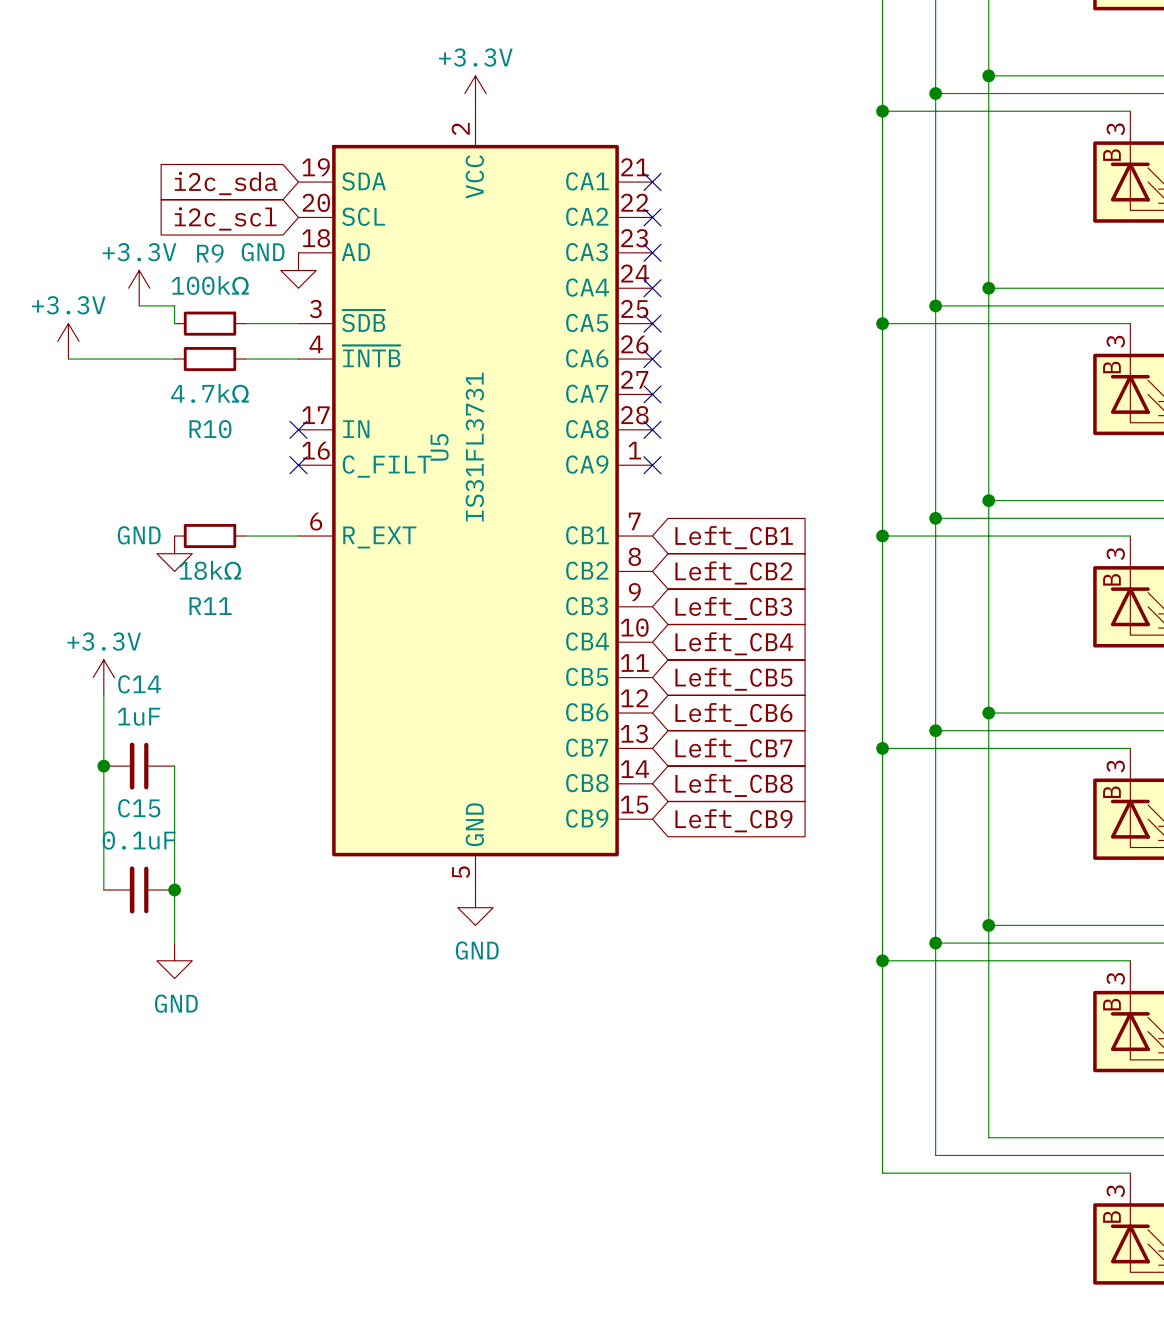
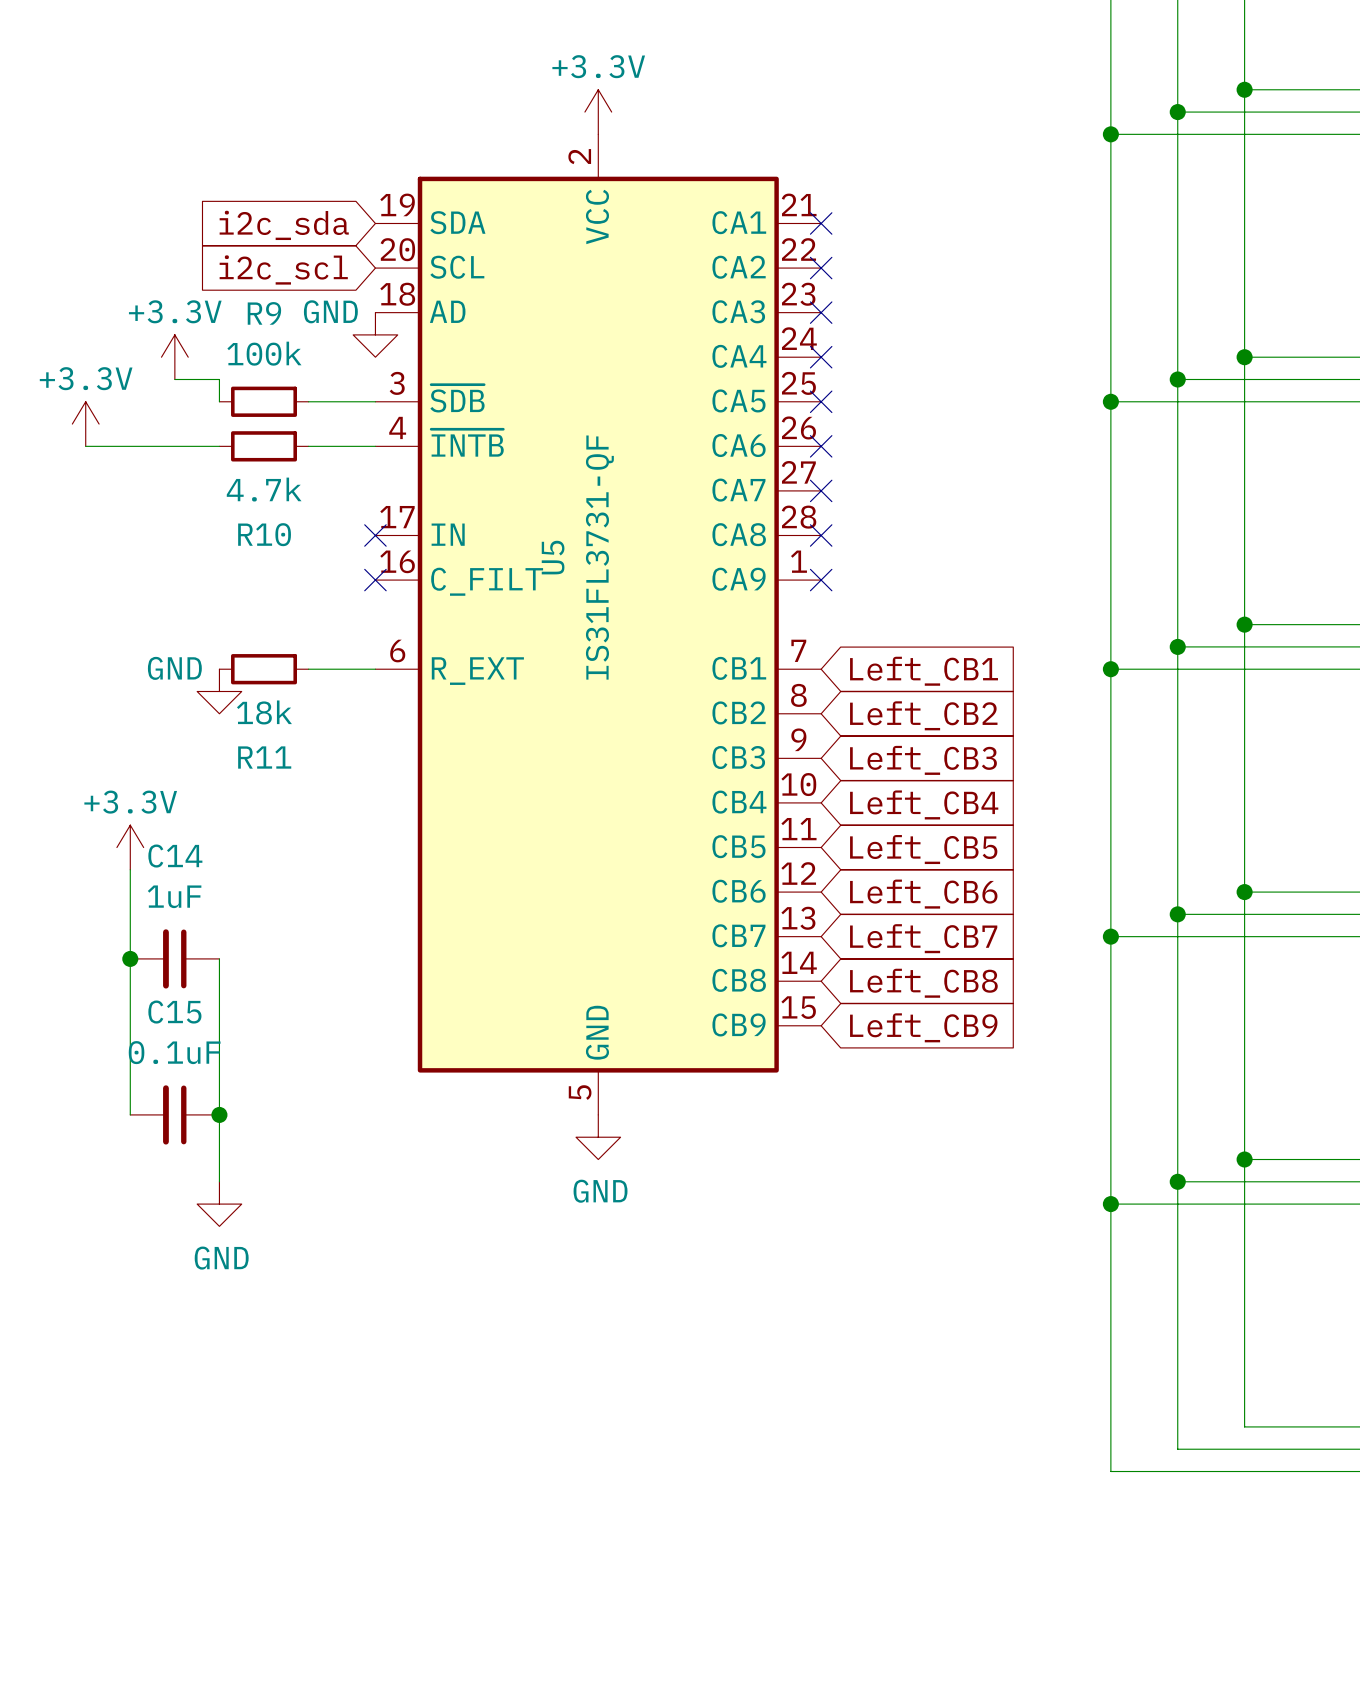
R9 value: 100kΩ (210, 285) -> 100k (264, 353)
R10 value: 4.7kΩ (209, 393) -> 4.7k (264, 489)
U5 value: IS31FL3731 (474, 447) -> IS31FL3731-QF (599, 557)
R11 value: 18kΩ (210, 570) -> 18k (264, 712)

